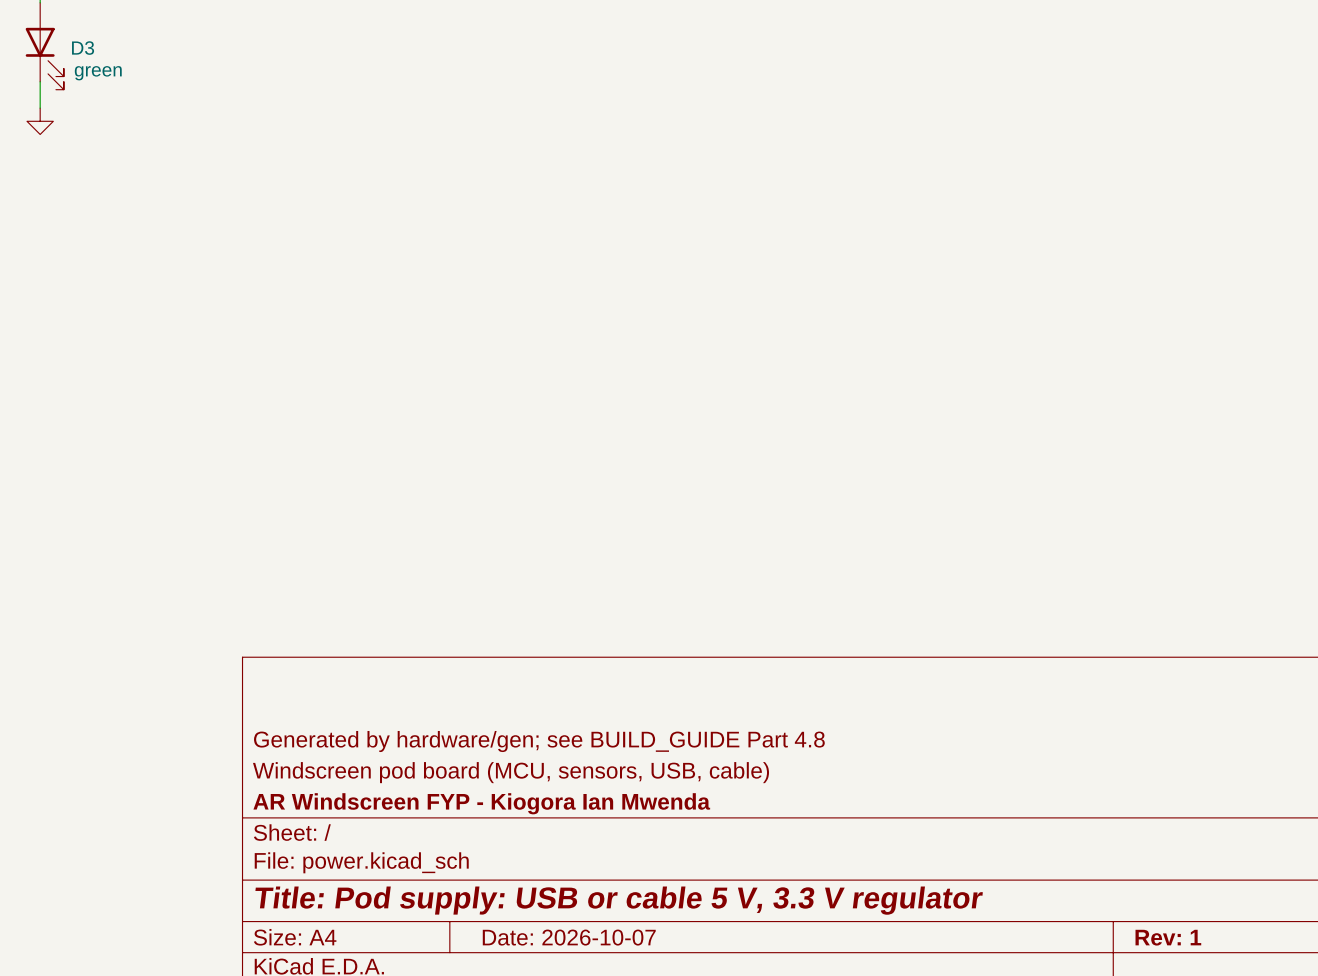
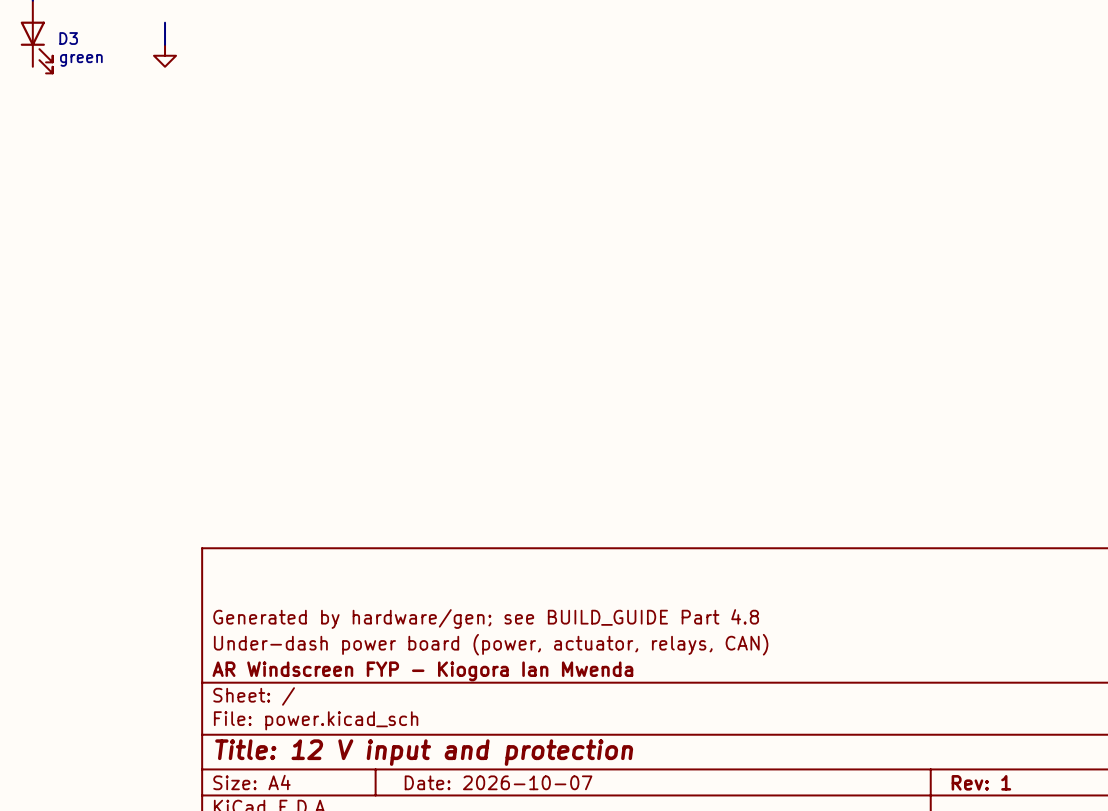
wire: (40, 81) (40, 108) -> (165, 22) (165, 44)
power symbol position: (40, 121) -> (165, 55)
title block: Windscreen pod board (MCU, sensors, USB, cable) (510, 772) -> Under-dash power board (power, actuator, relays, CAN) (491, 644)
title block: Title: Pod supply: USB or cable 5 V, 3.3 V regulator (619, 900) -> Title: 12 V input and protection (424, 752)

